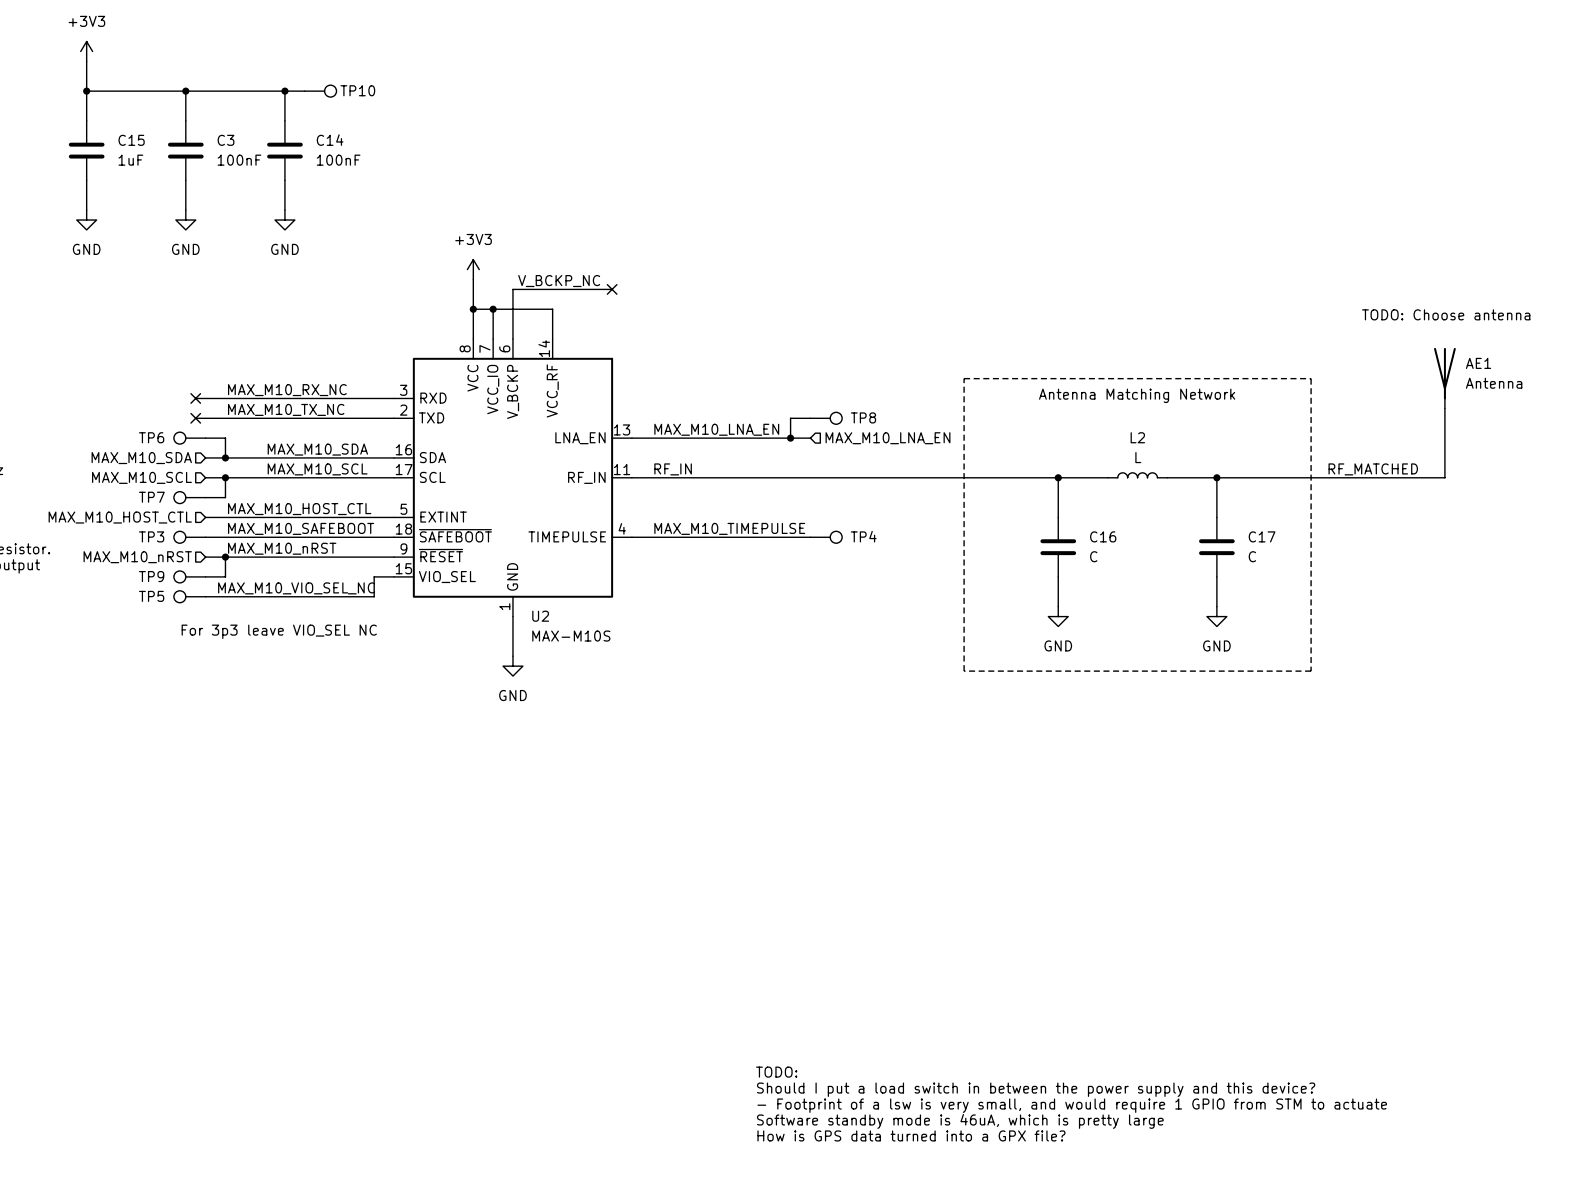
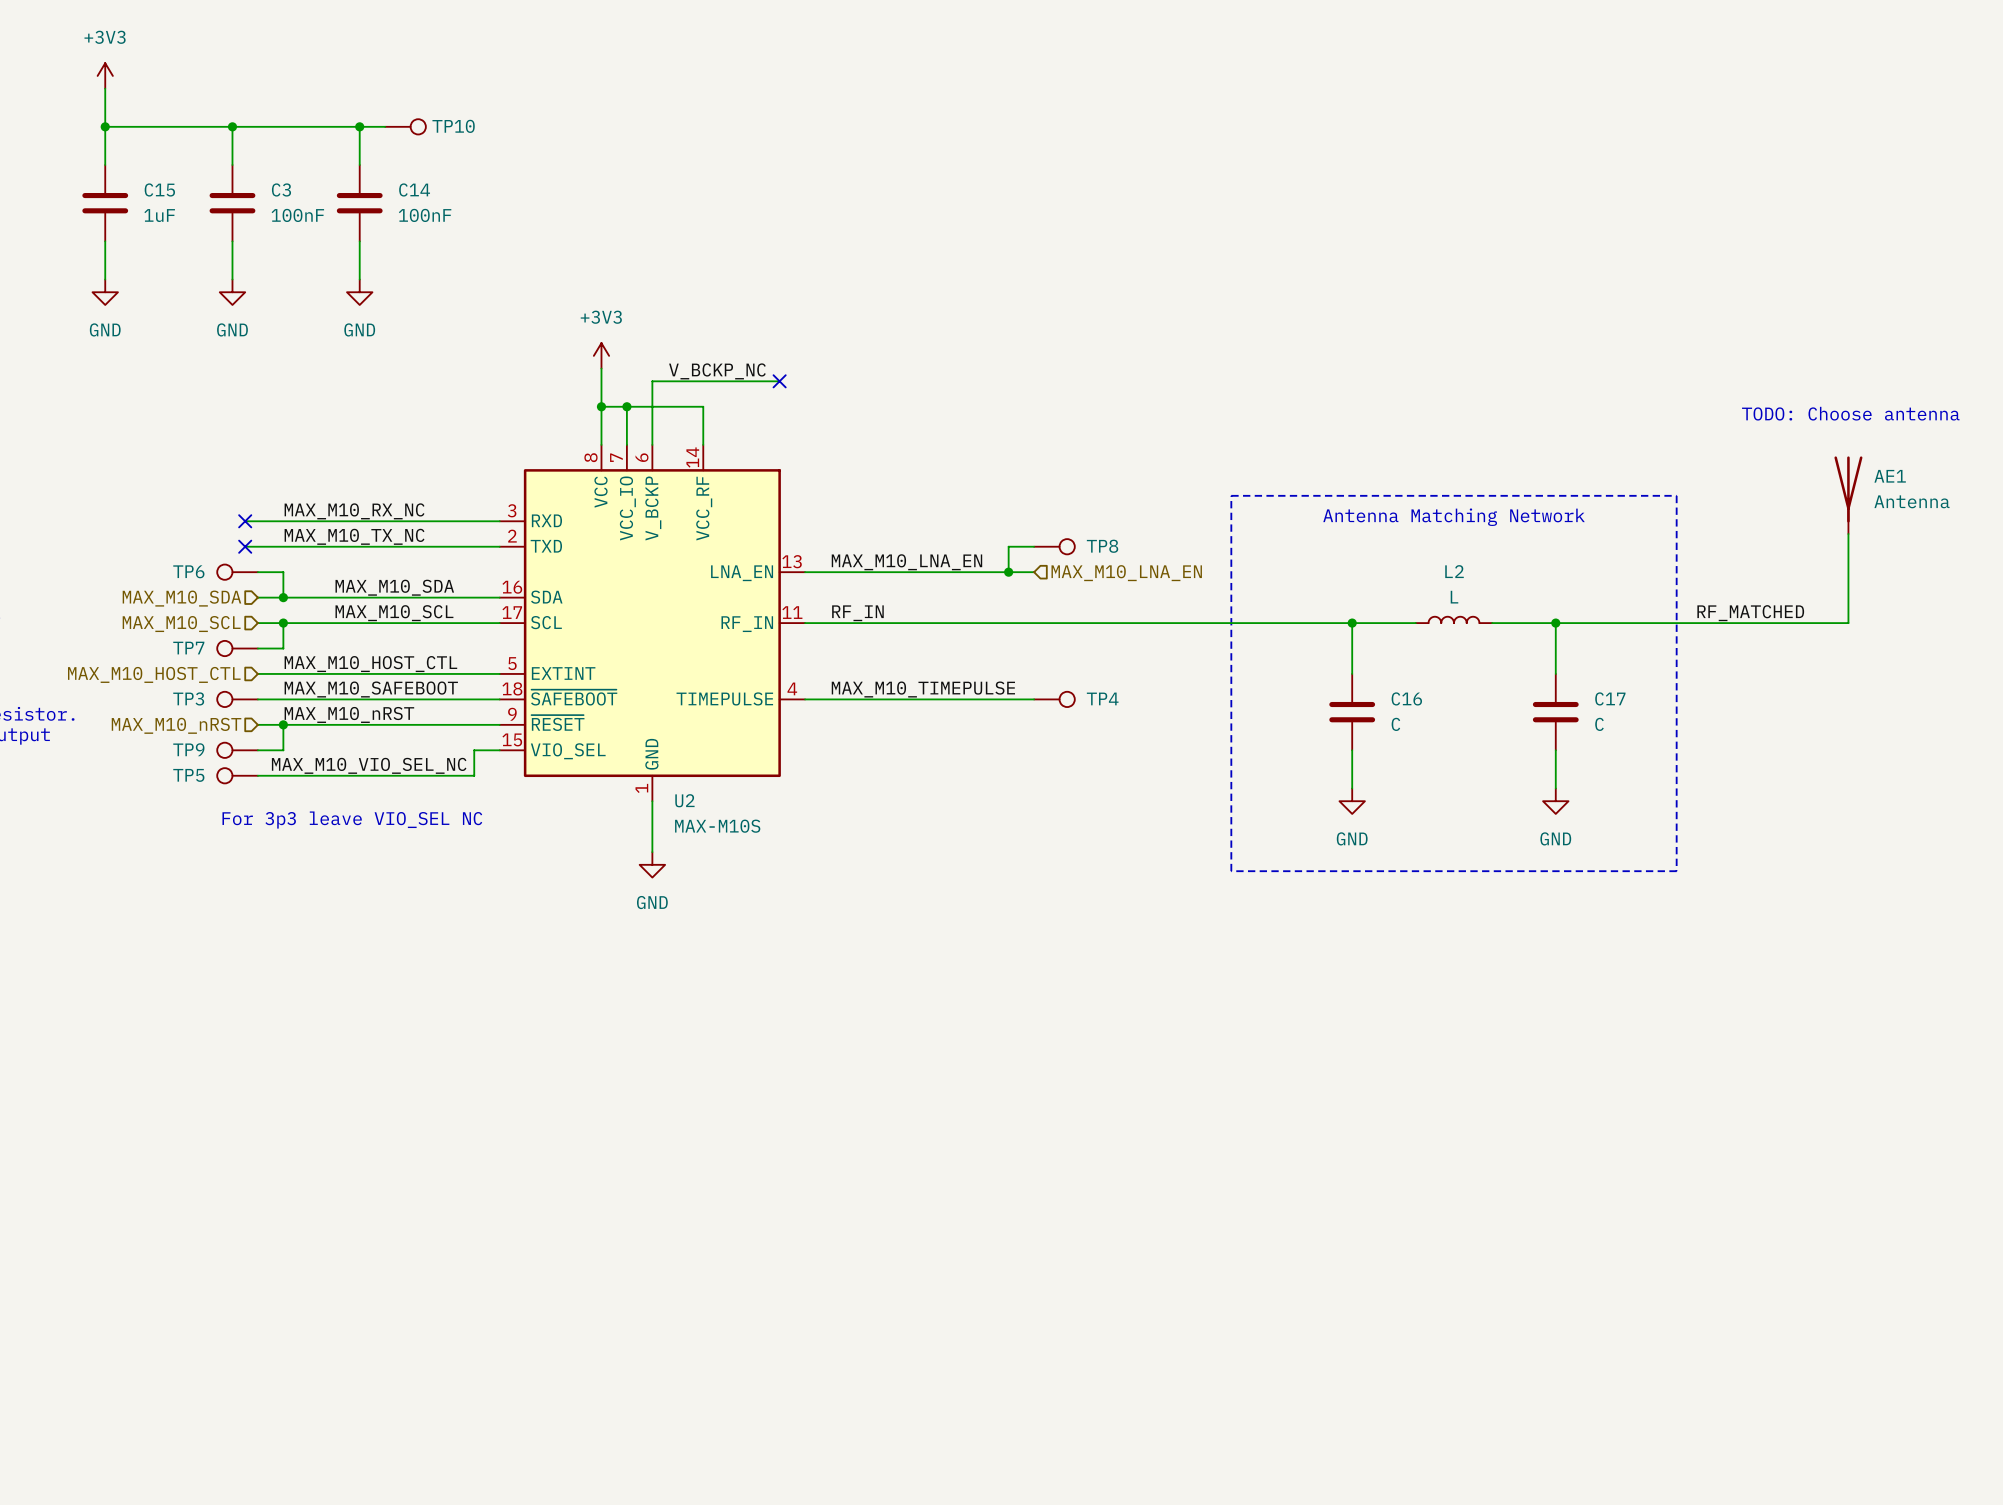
text: TODO: (776, 1072) -> none
text: Should I put a load switch in between the power supply and this device? (1036, 1089) -> none
text: - Footprint of a lsw is very small, and would require 1 GPIO from STM to actuate (1072, 1105) -> none
text: Software standby mode is 46uA, which is pretty large (960, 1121) -> none
text: How is GPS data turned into a GPX file? (911, 1135) -> none

